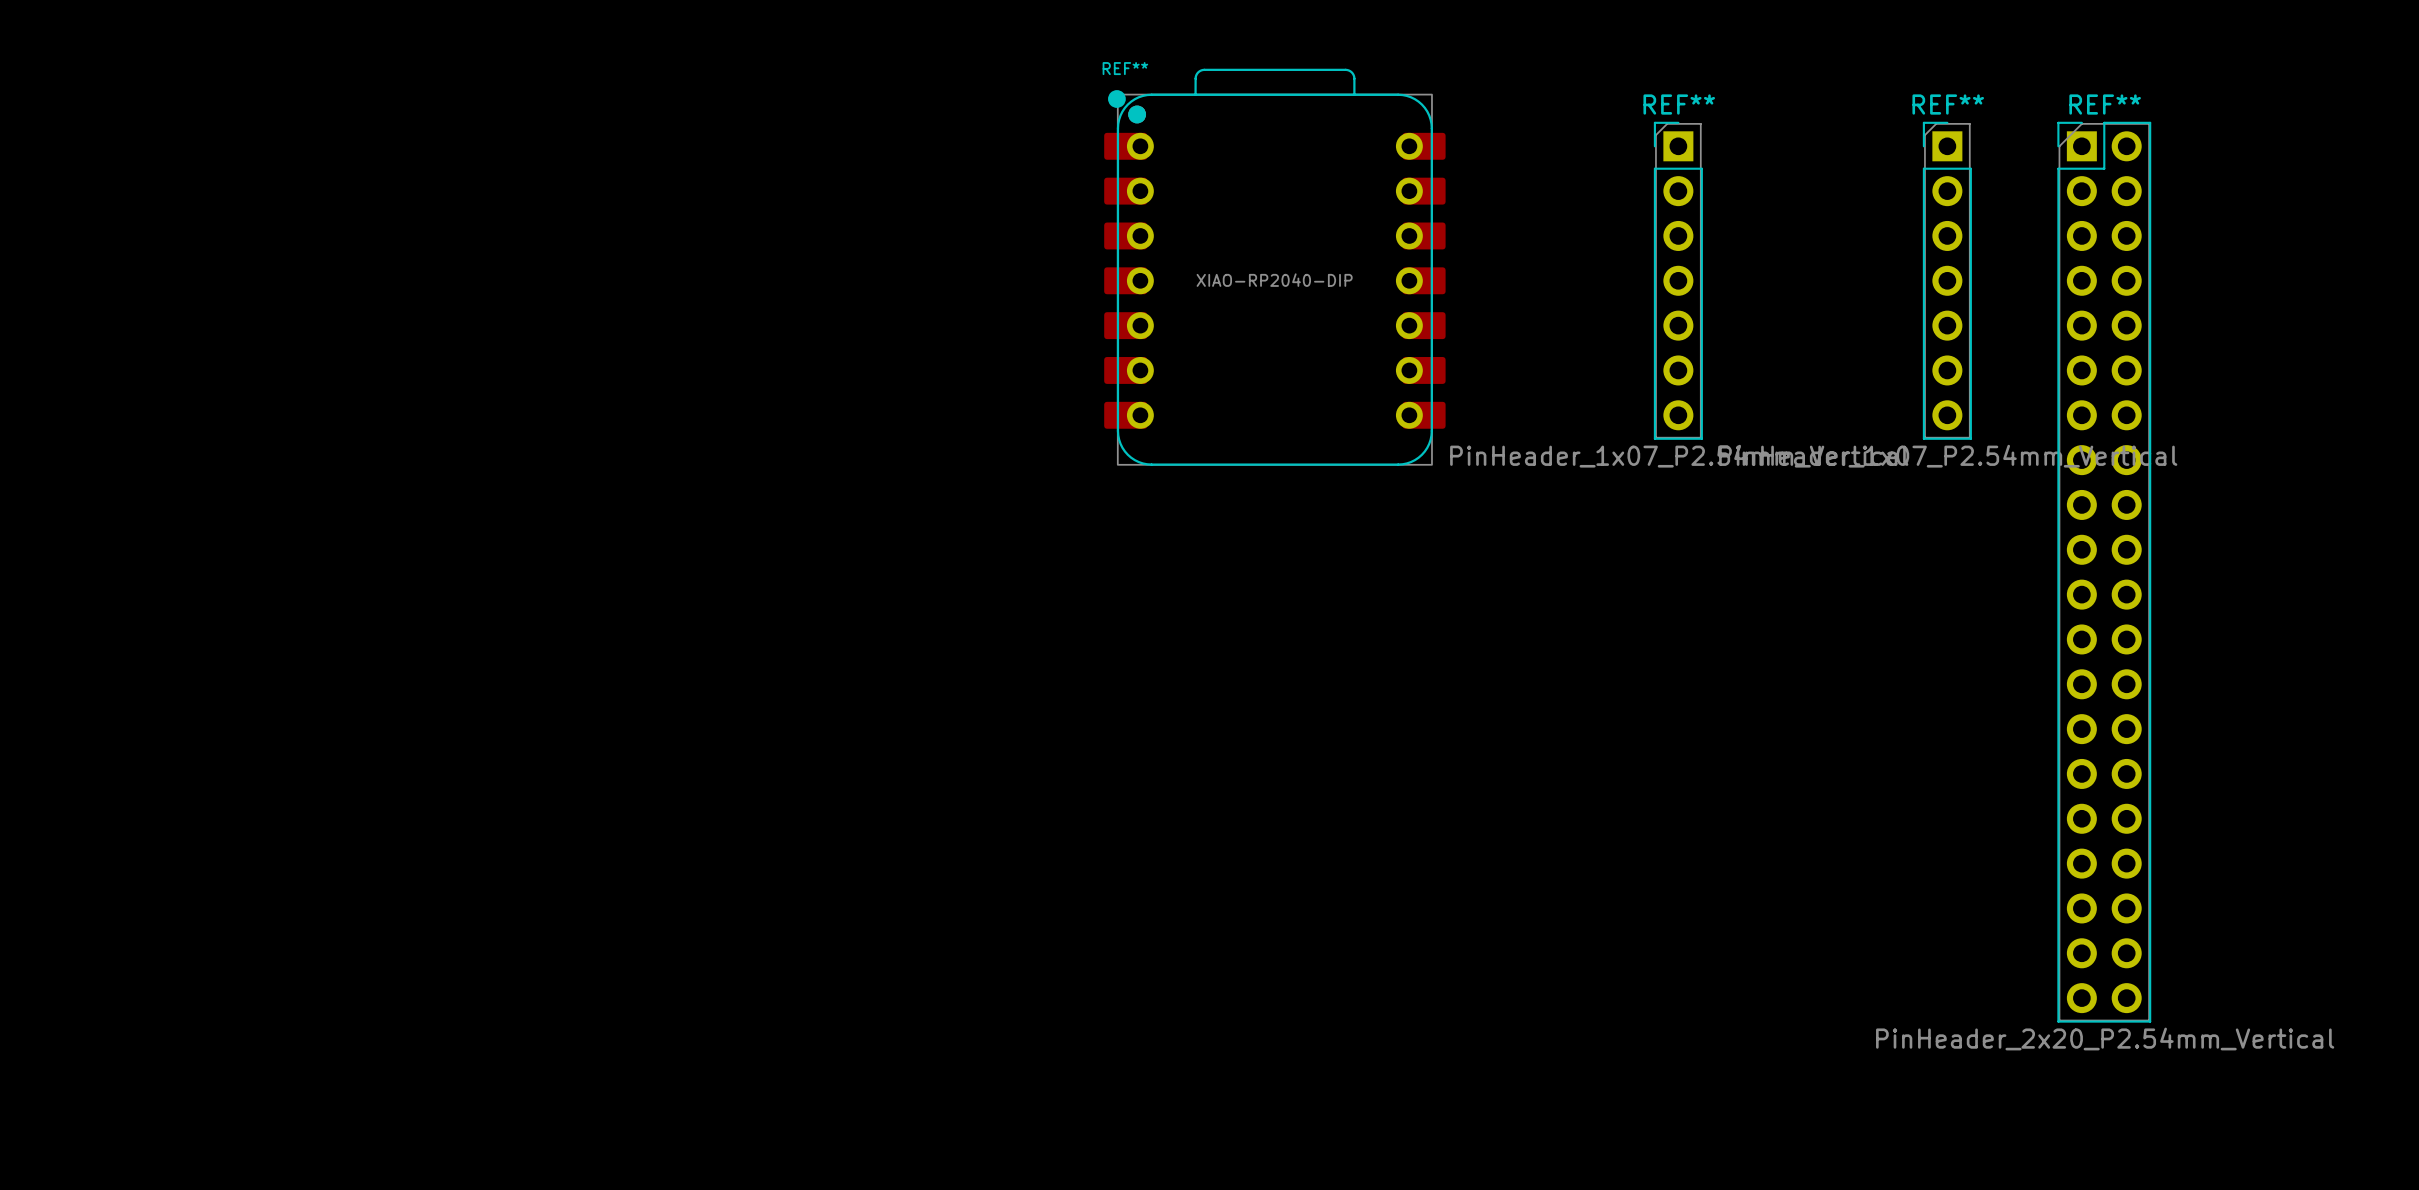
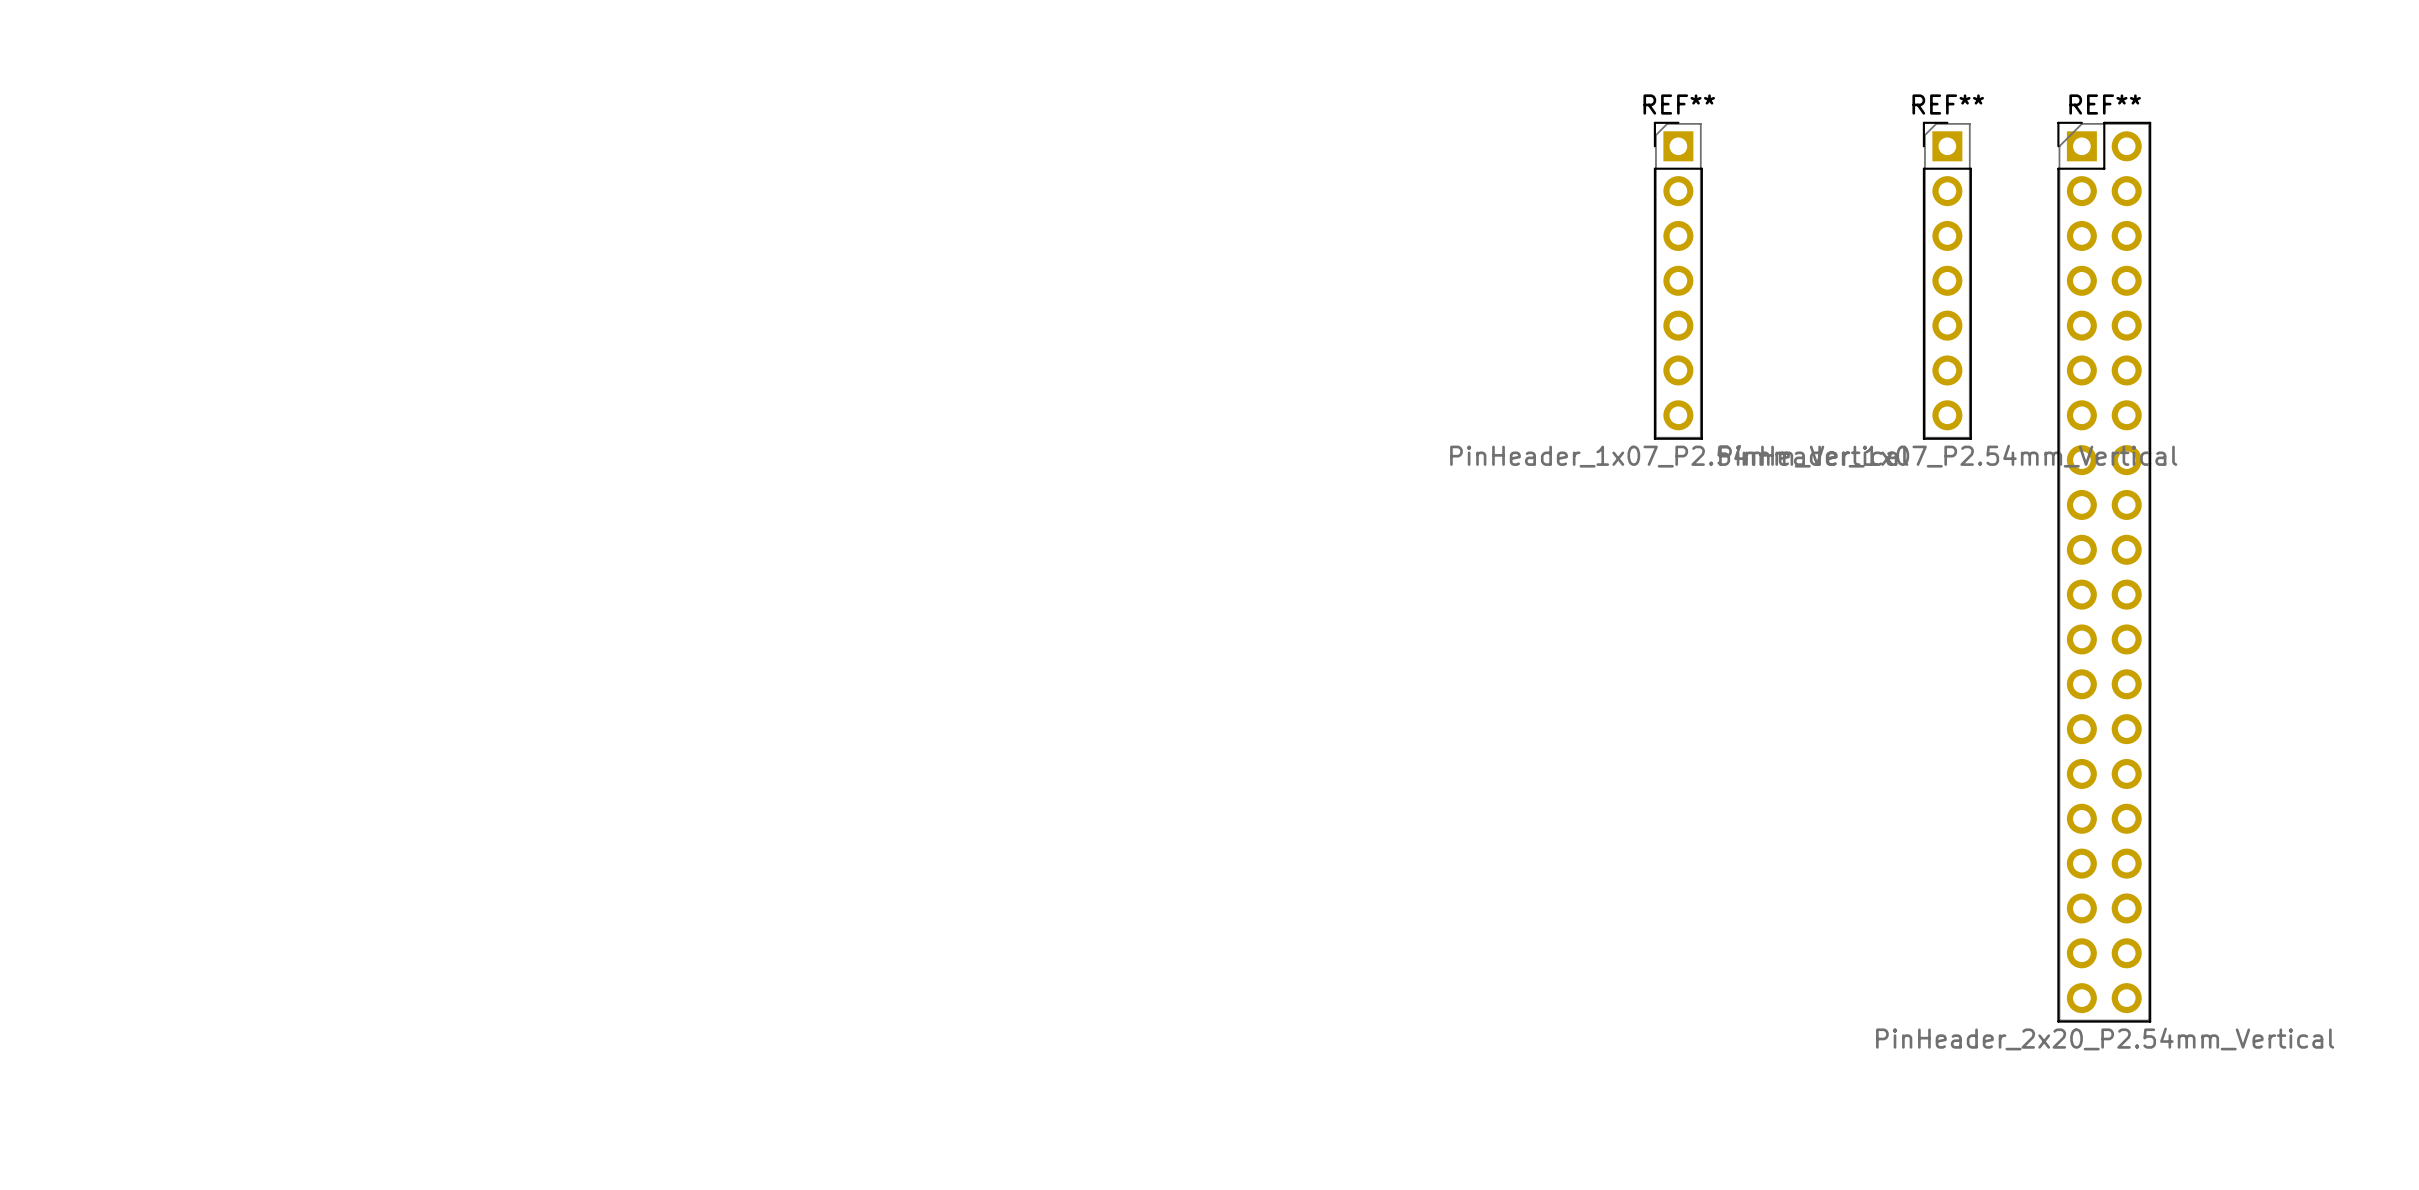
REF**: XIAO-RP2040-DIP (1274, 267) -> none

